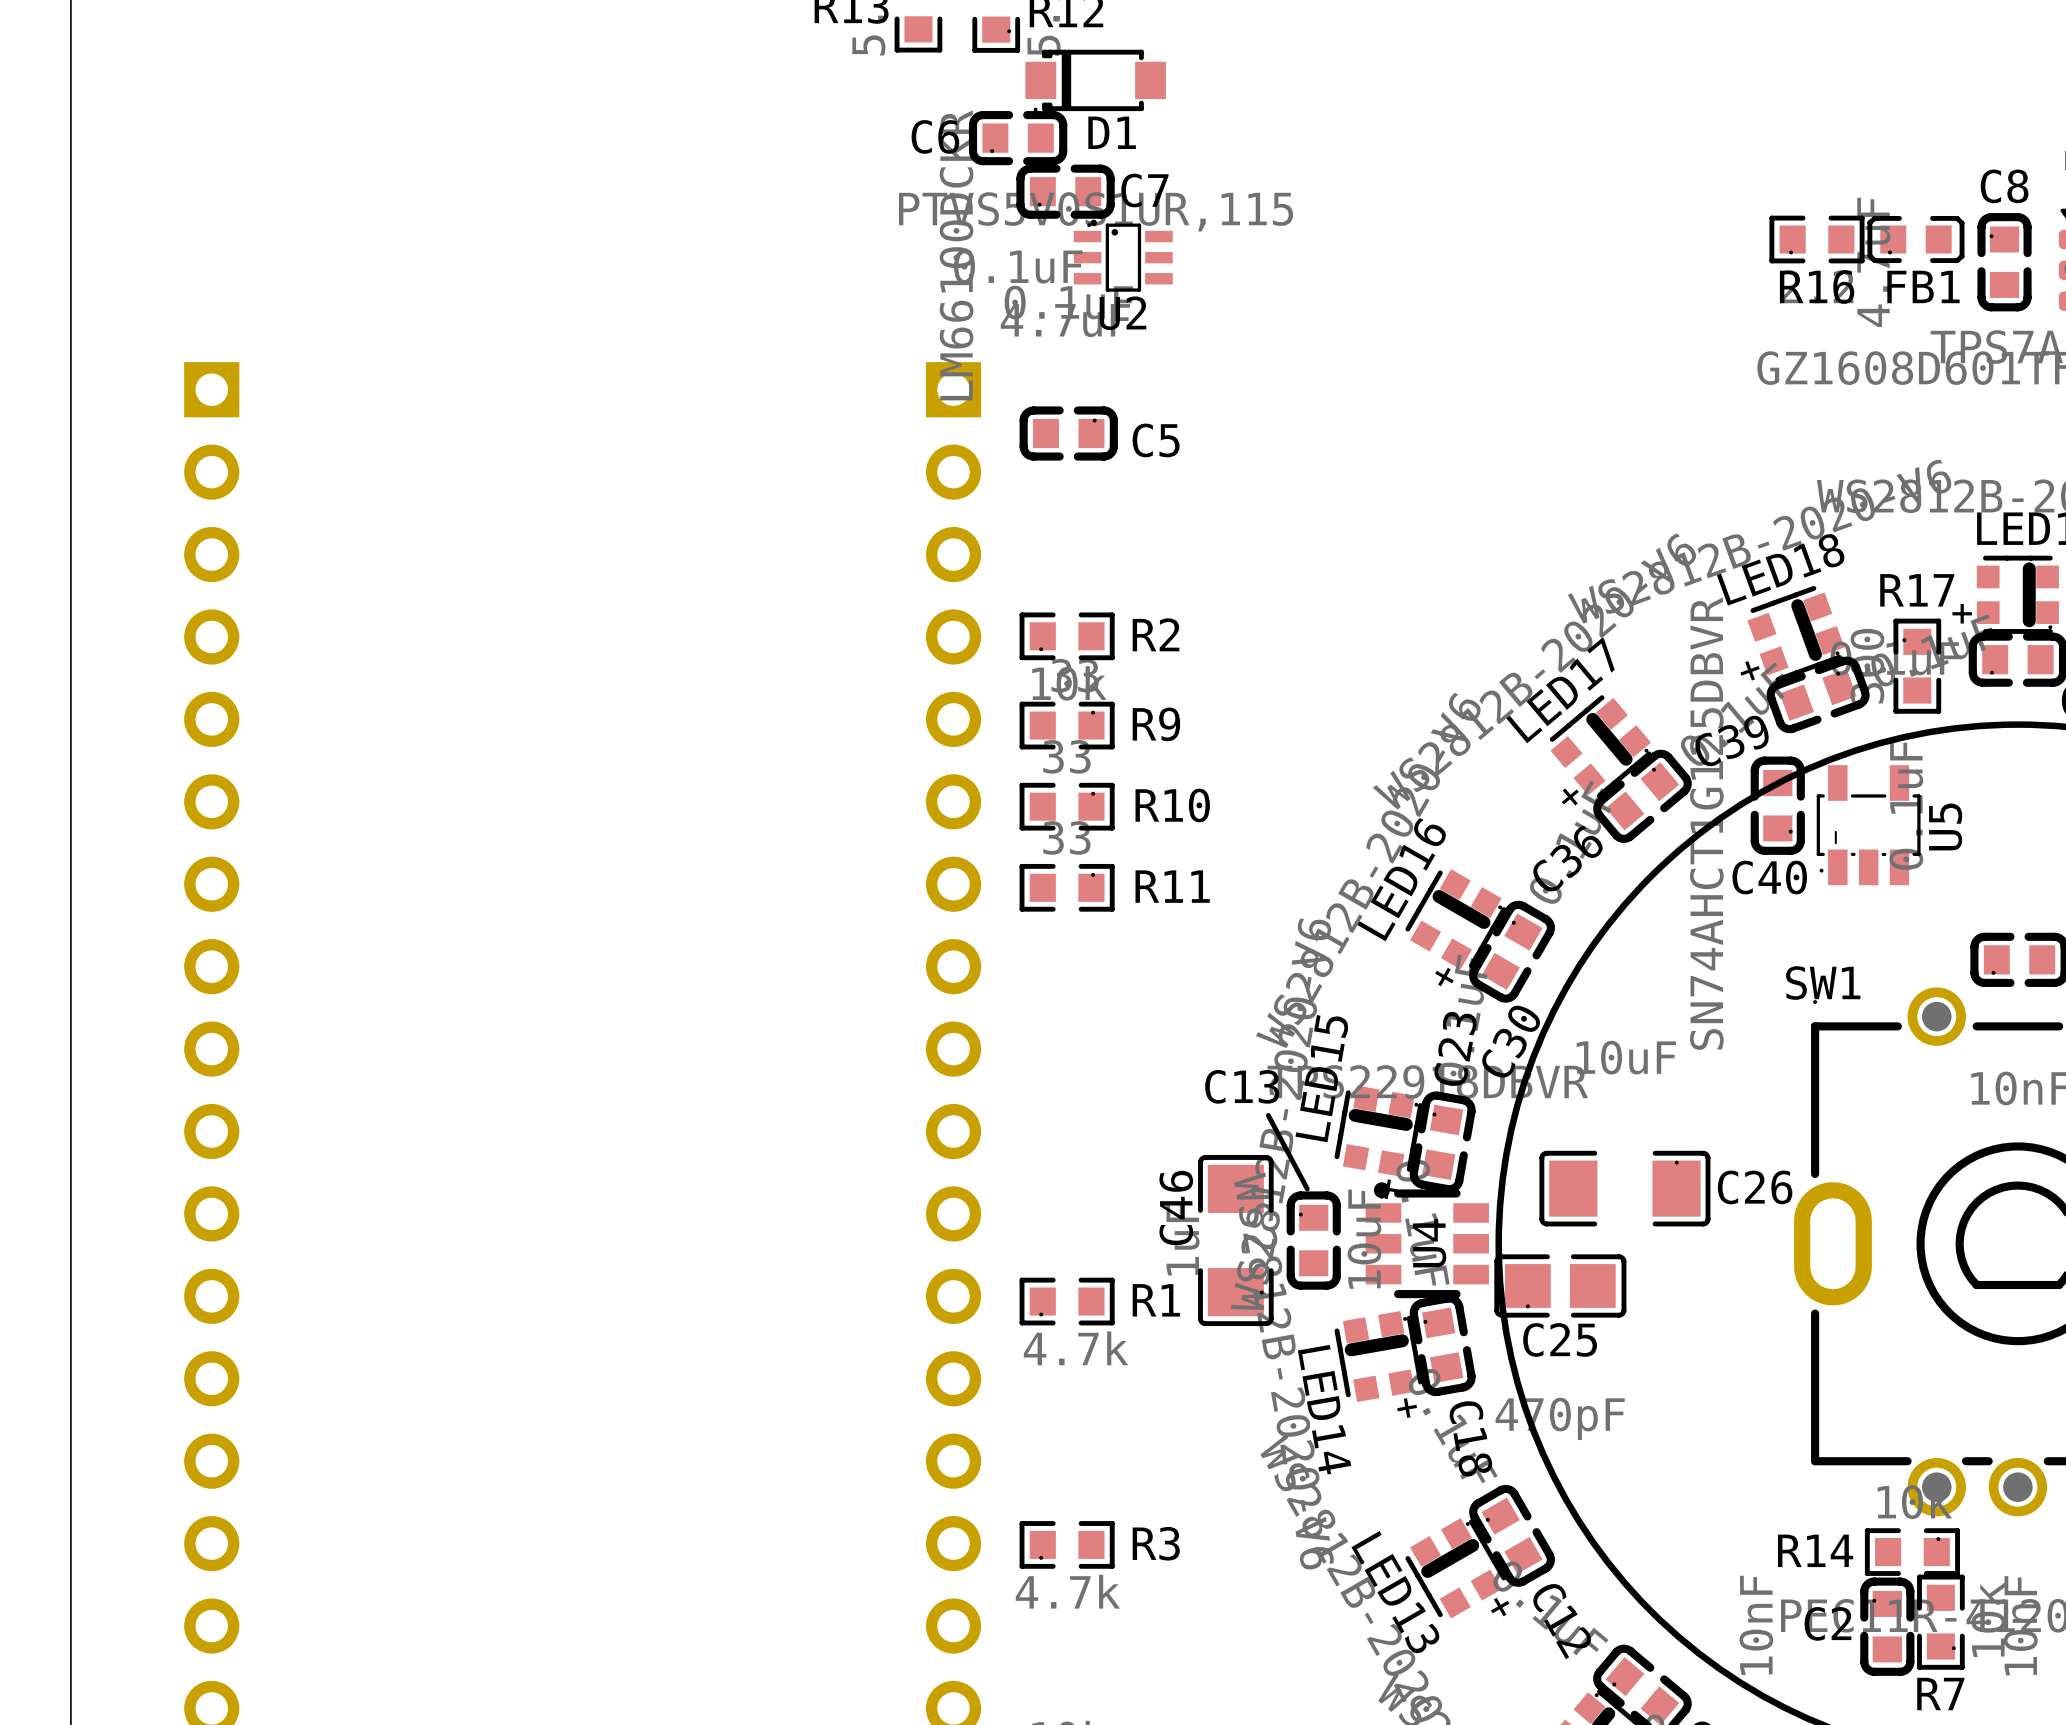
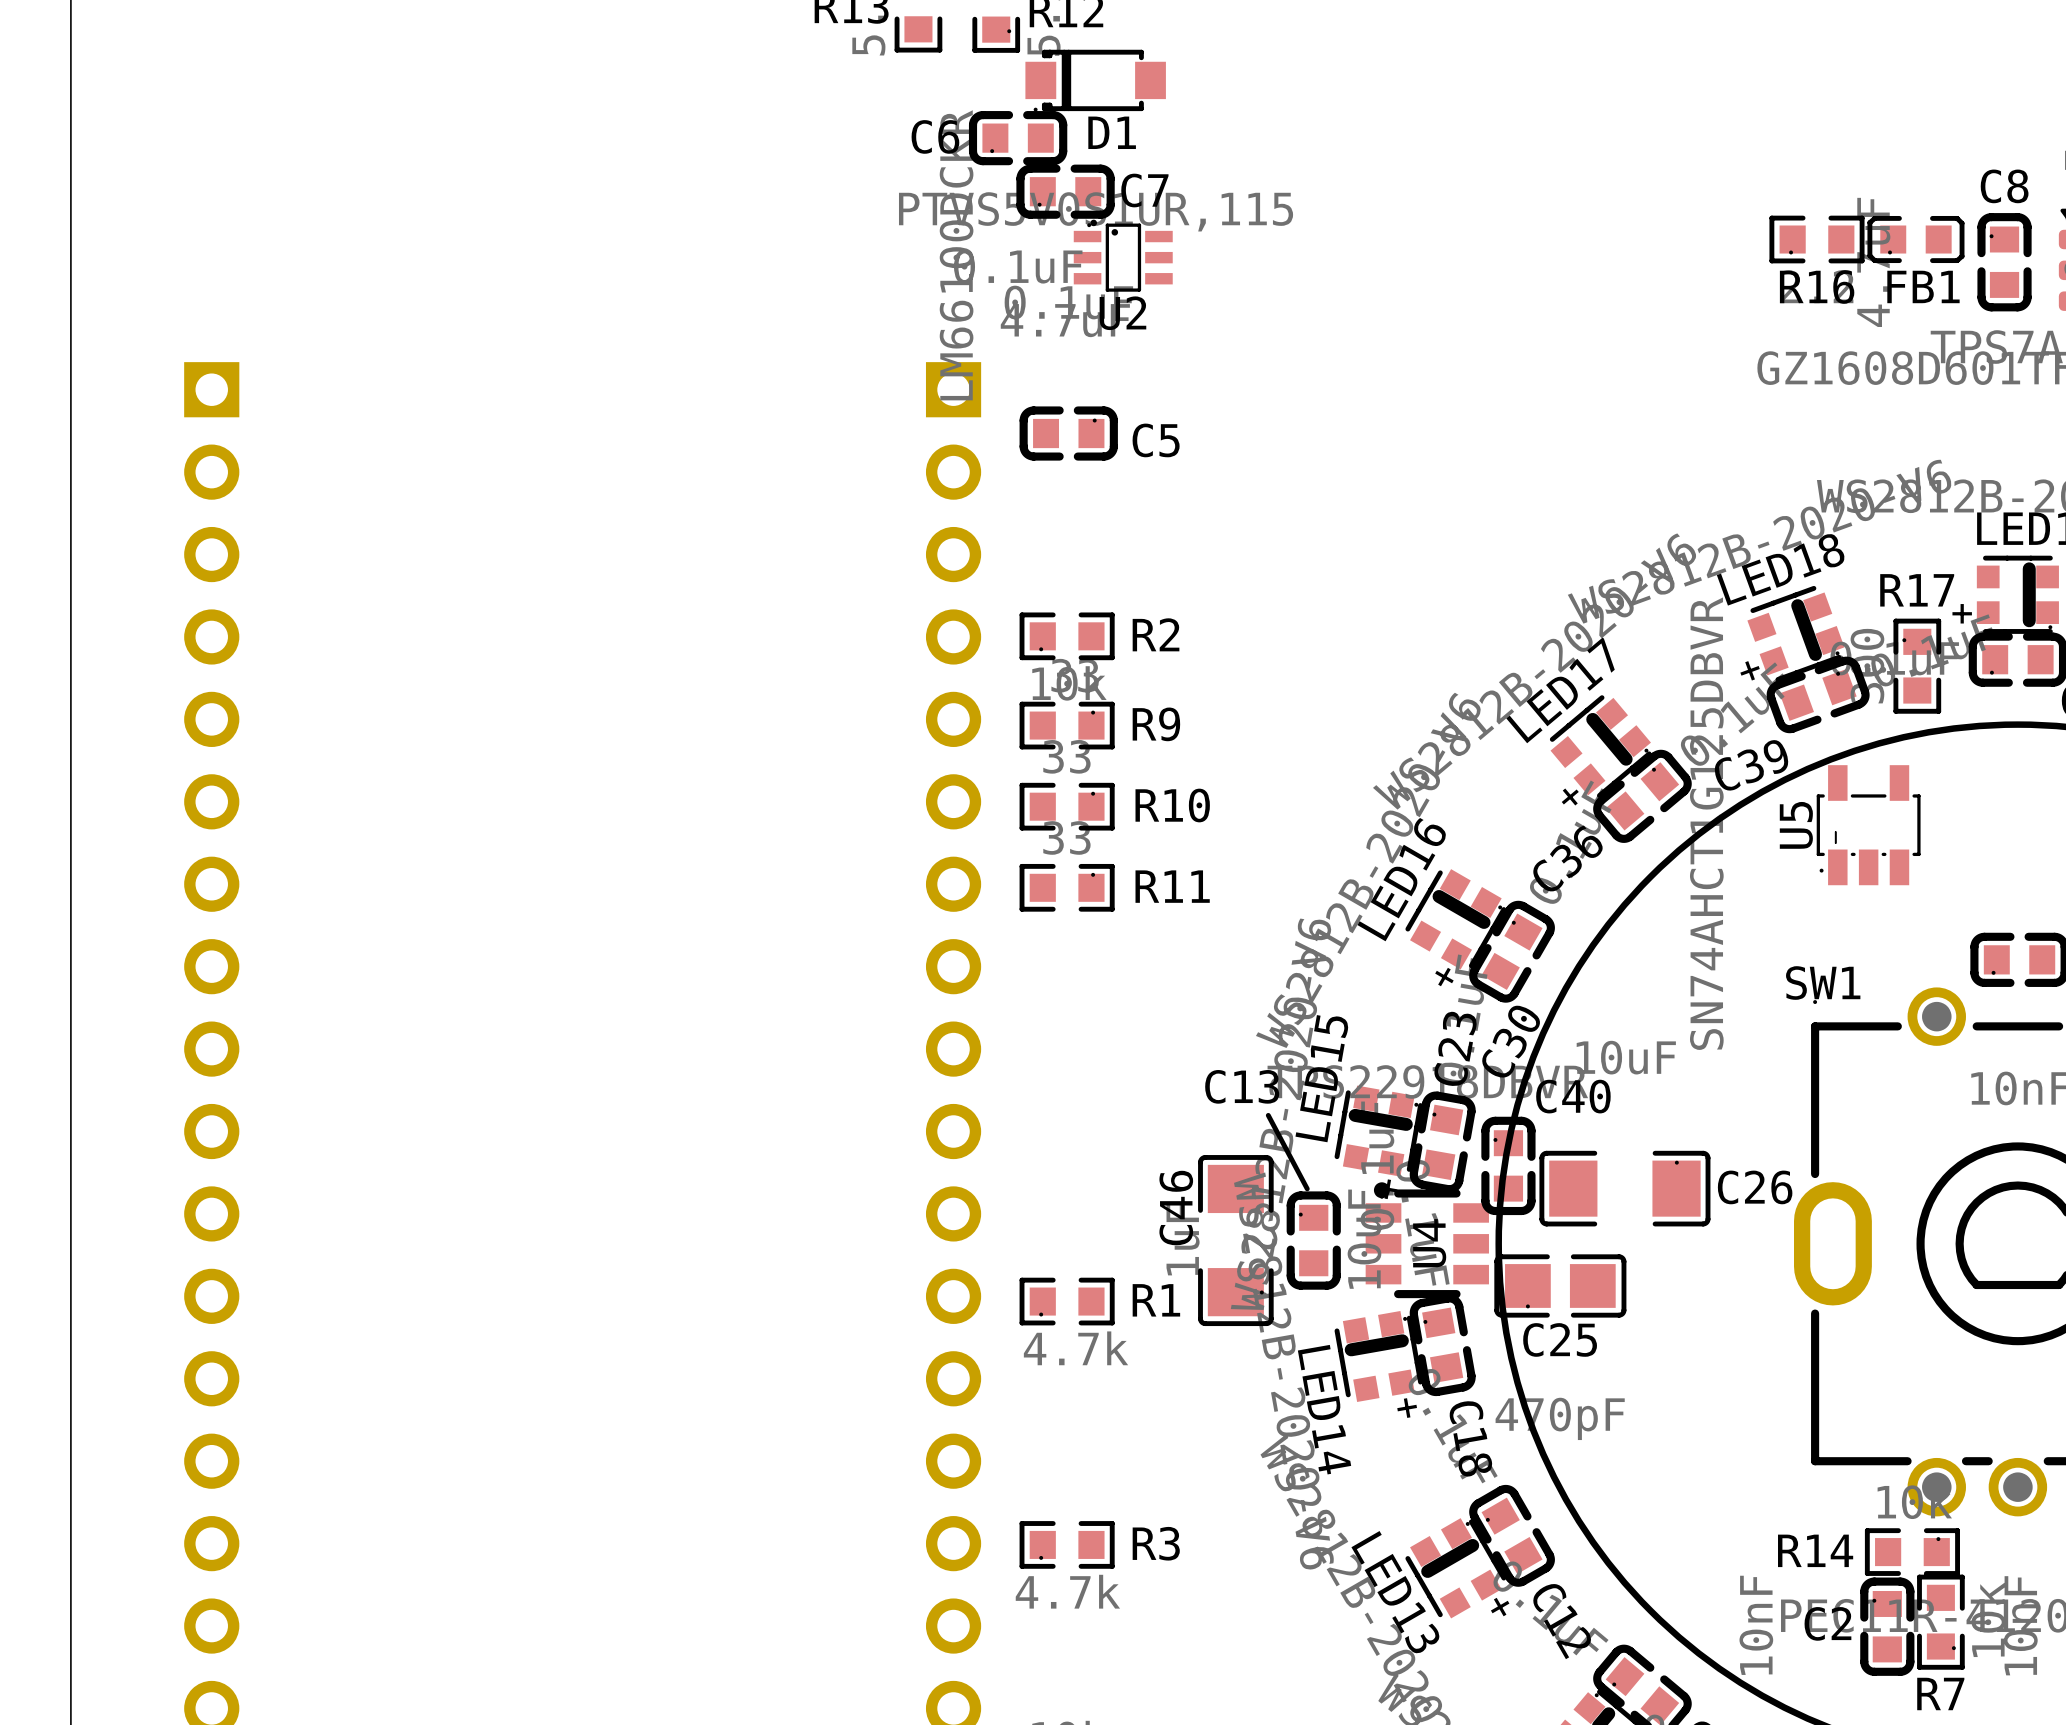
C39 name position: C39 (1731, 741) -> C39 (1751, 765)
C40 rotation: 0° (1777, 805) -> 180° (1508, 1165)
C40 position: (1777, 805) -> (1508, 1165)
U5 name position: U5 (1945, 826) -> U5 (1796, 825)

